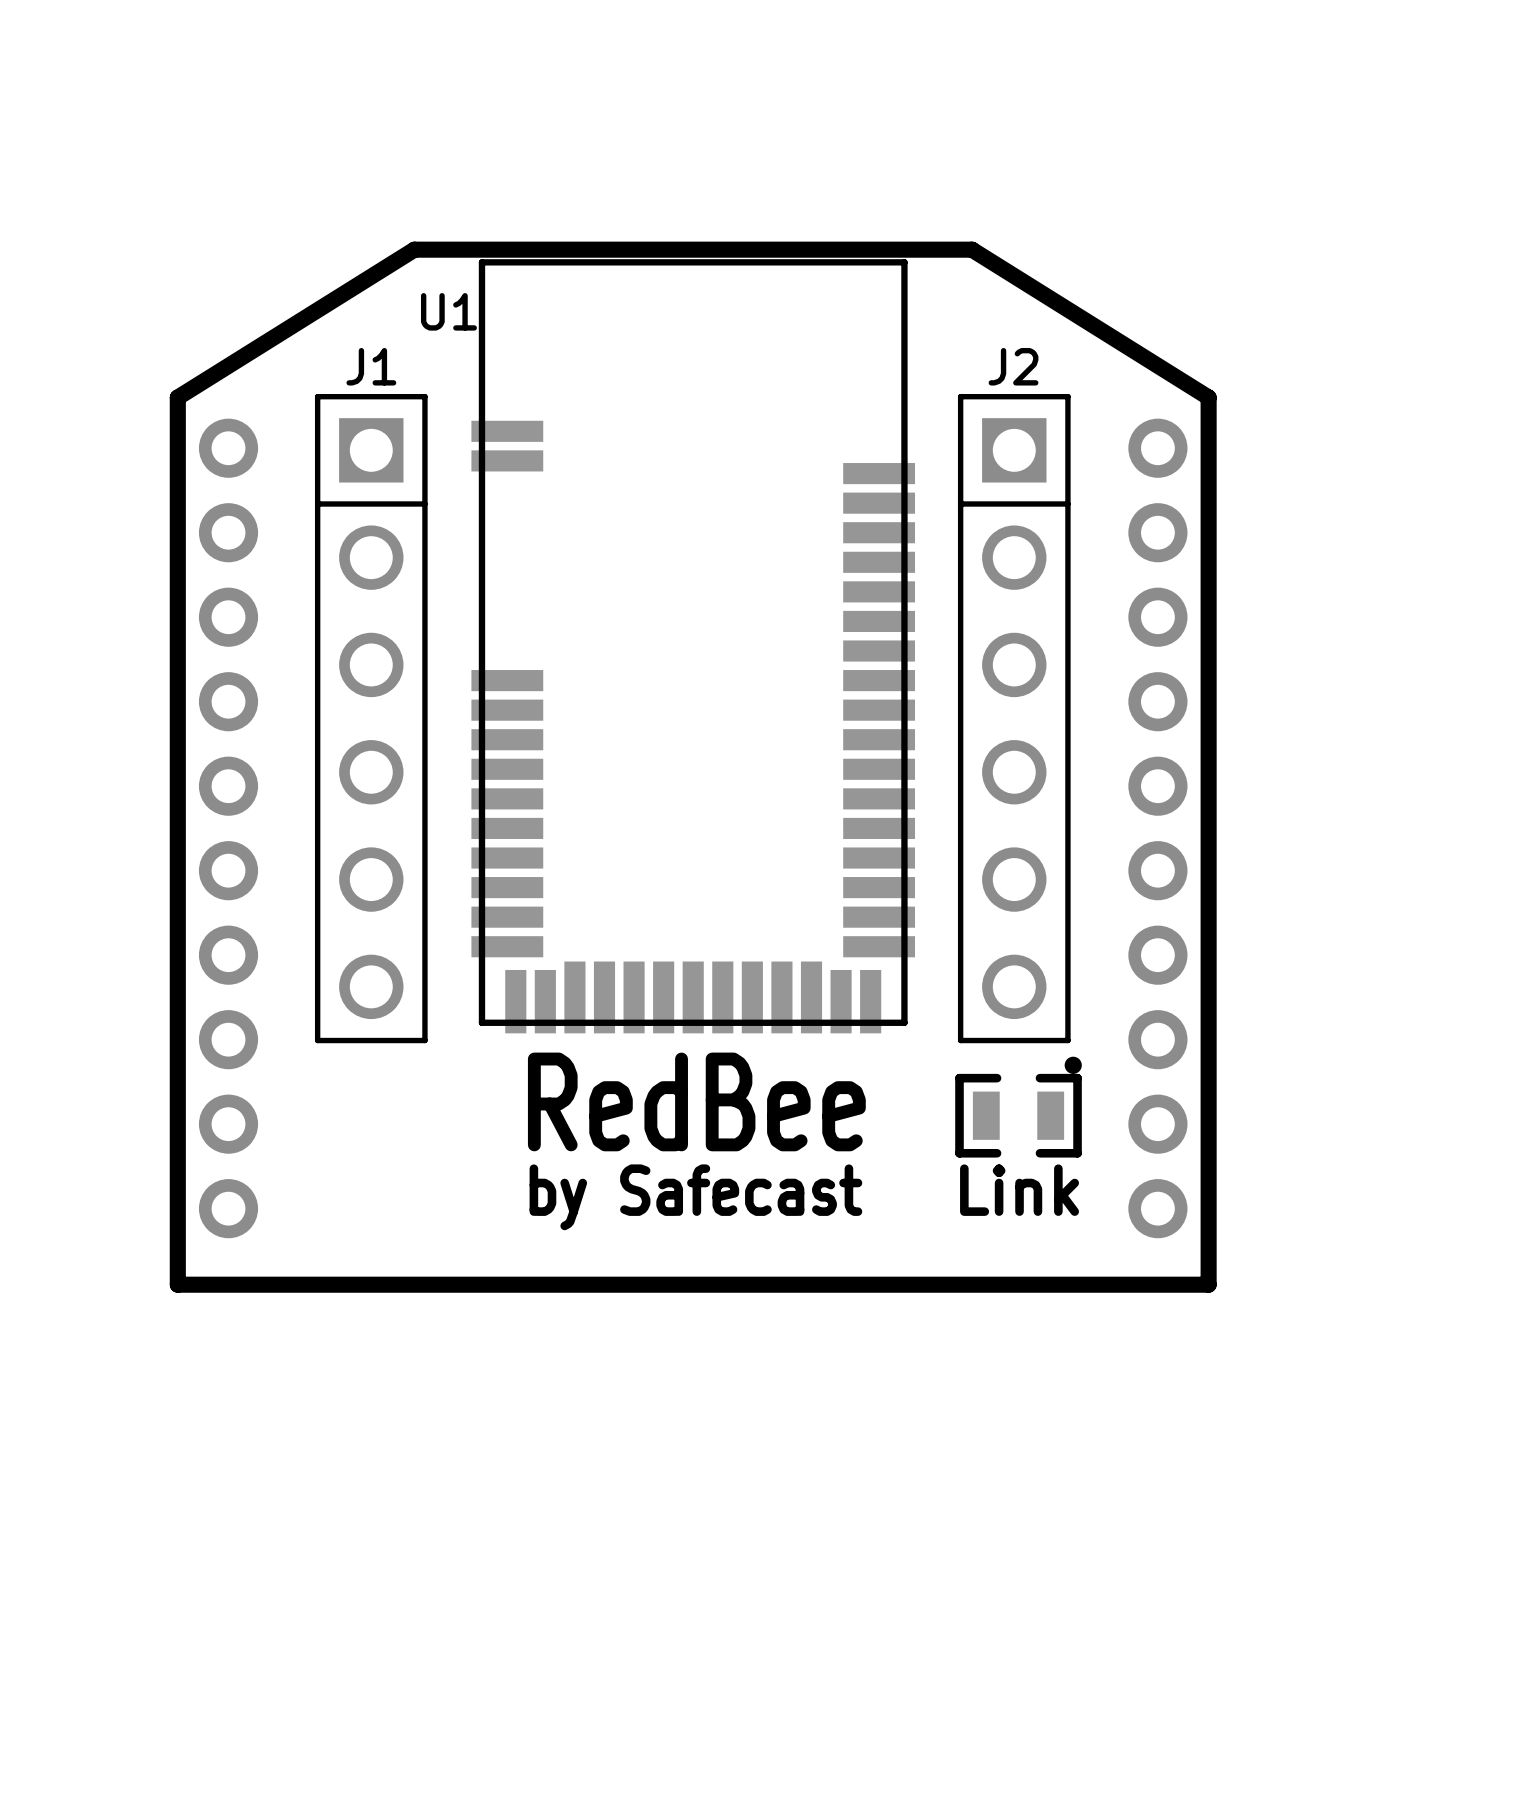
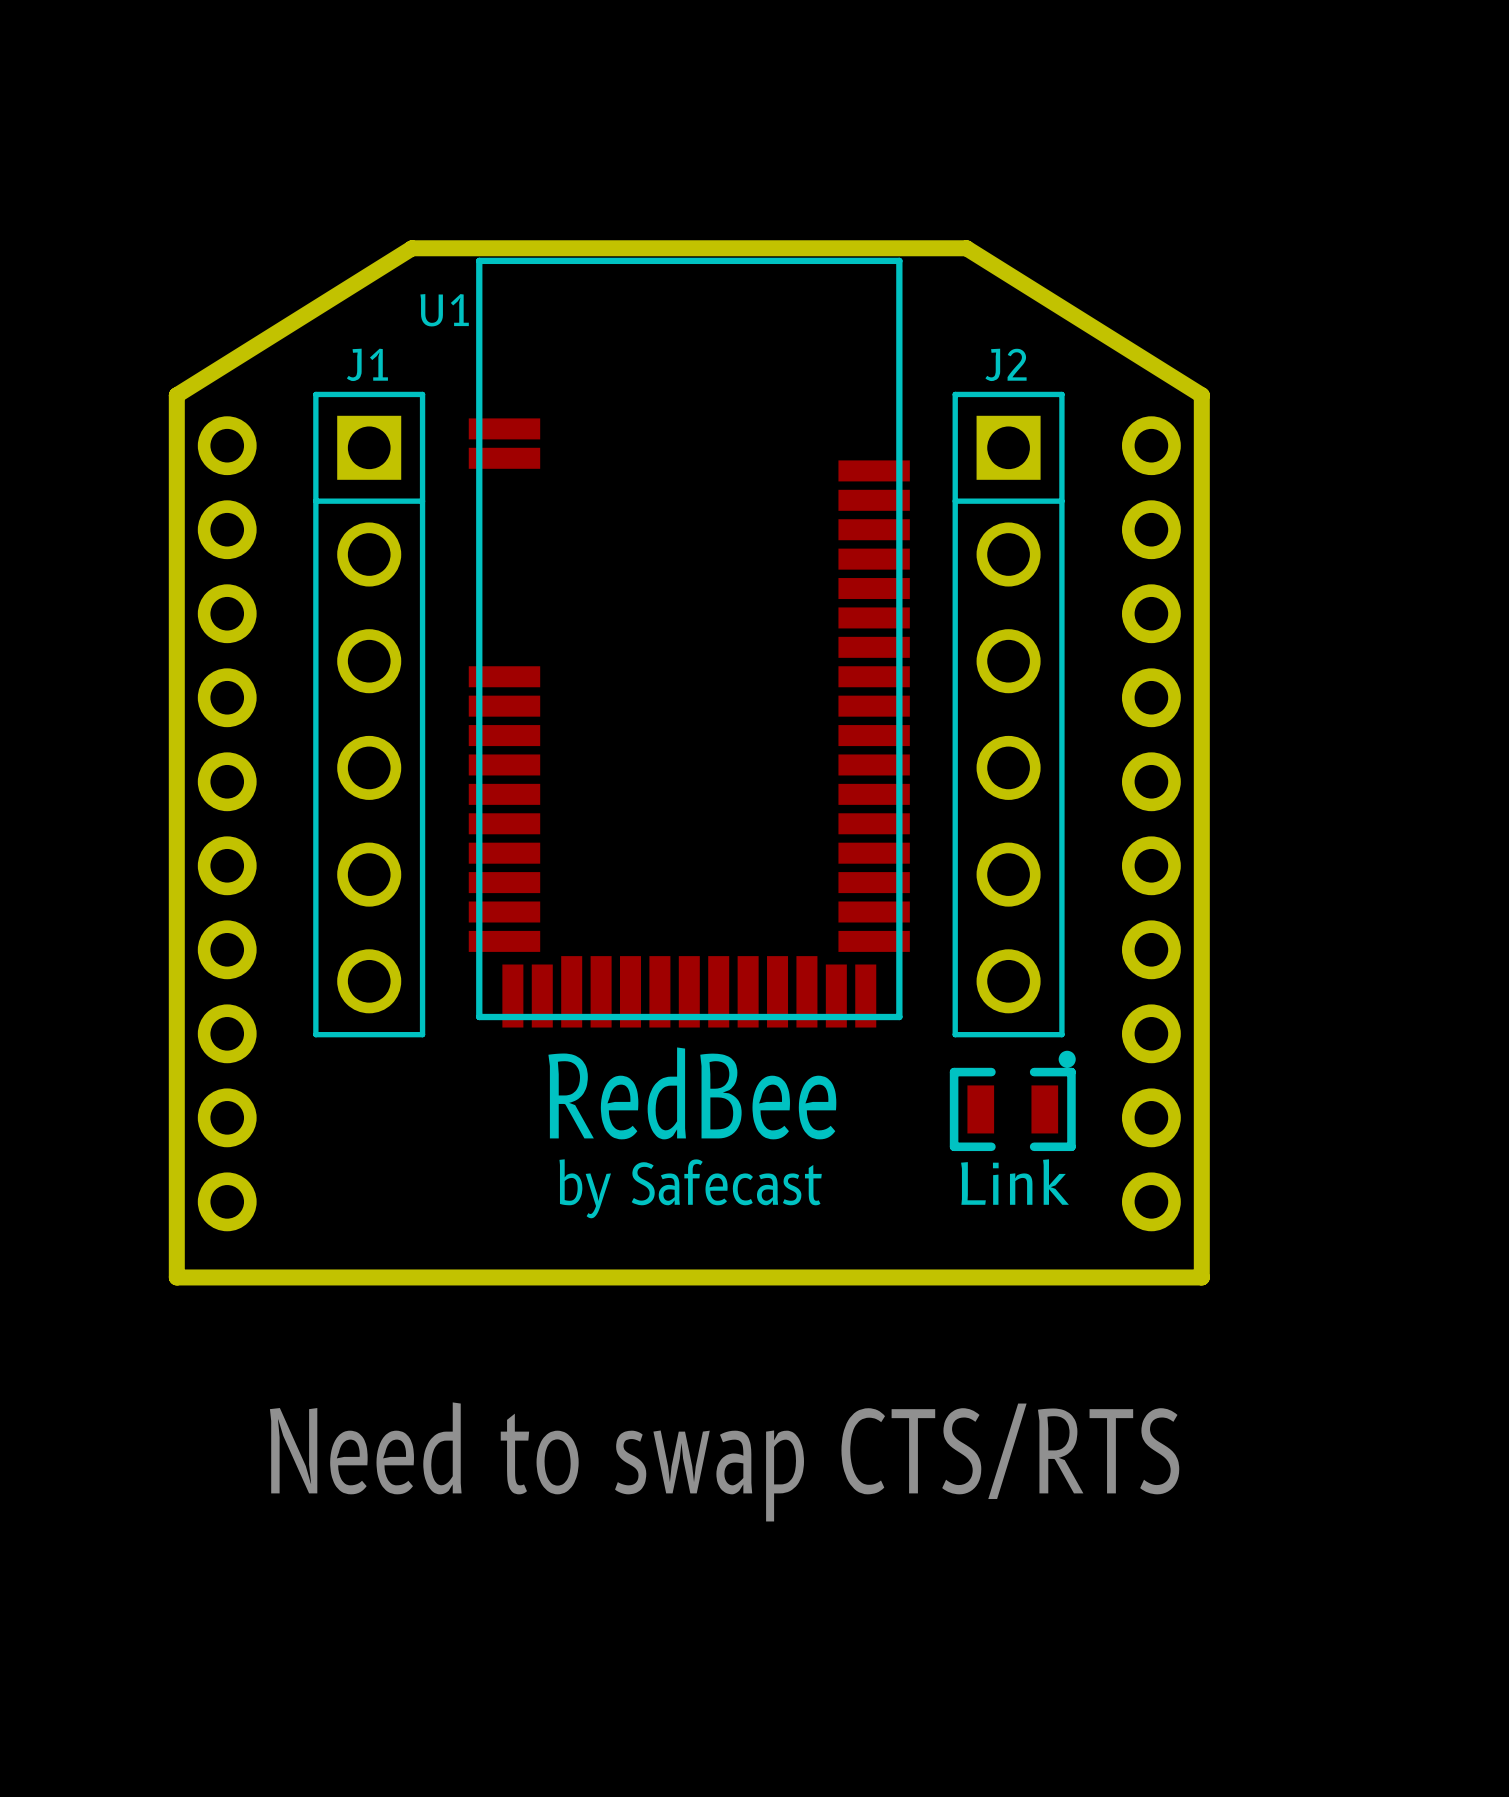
text: none -> Need to swap CTS/RTS (724, 1461)

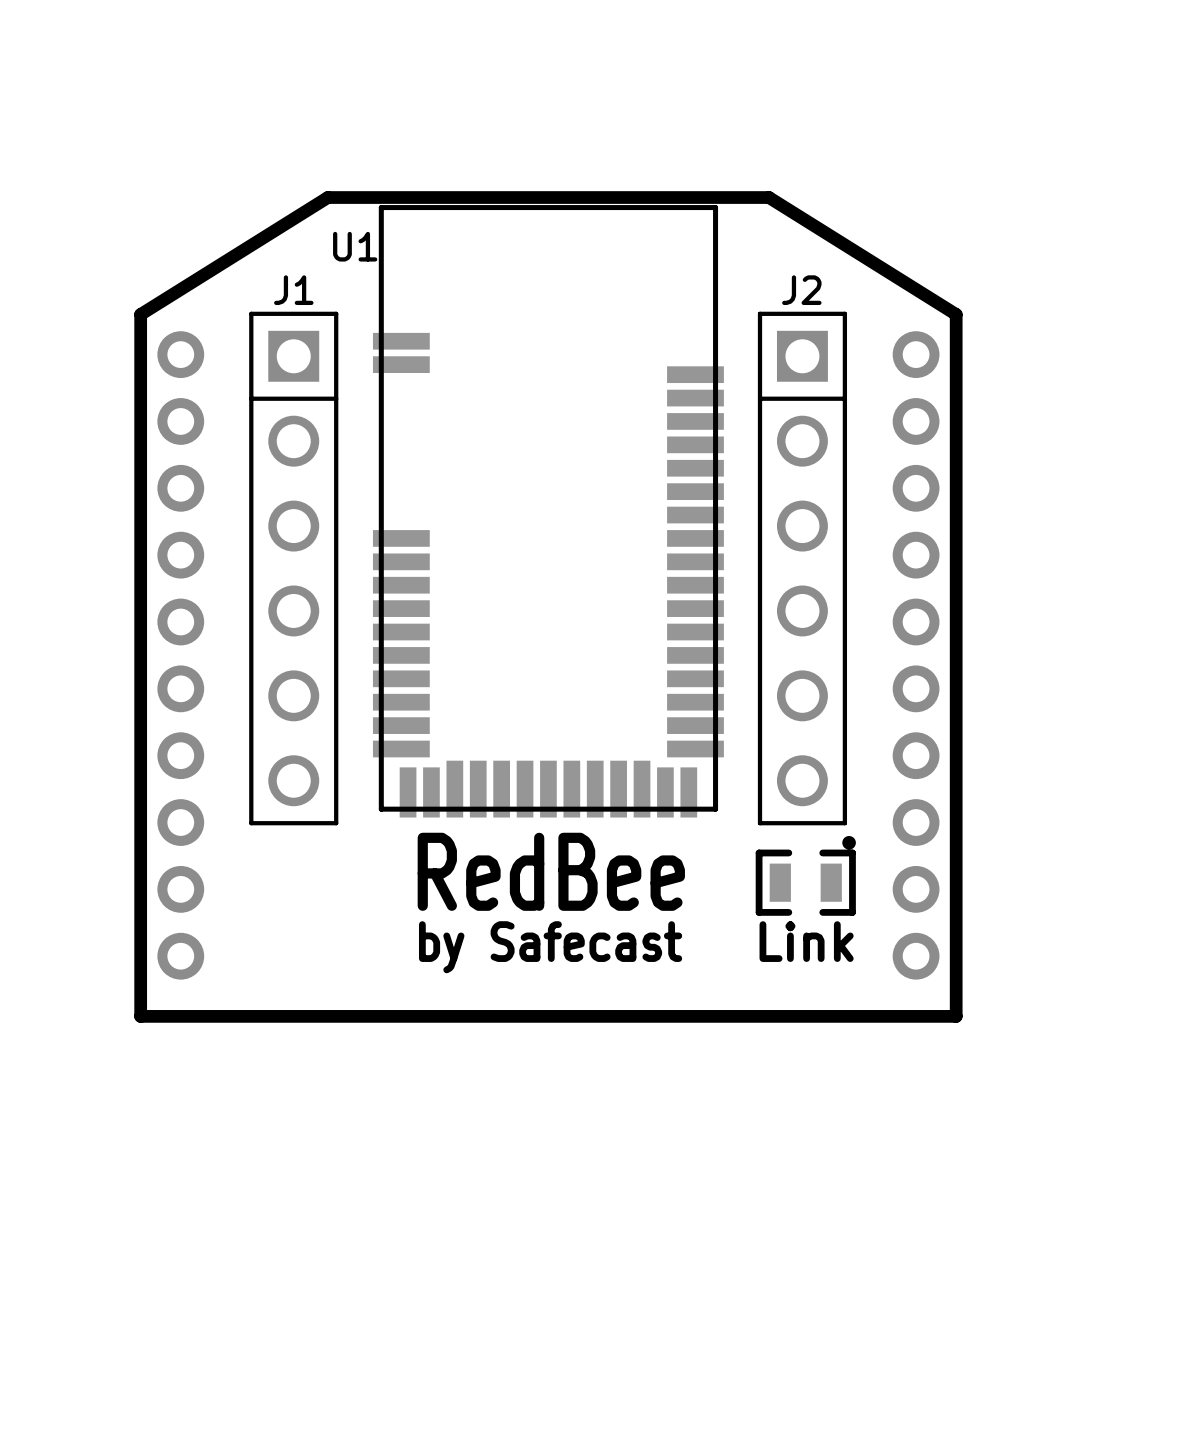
text: Need to swap CTS/RTS (724, 1461) -> none

